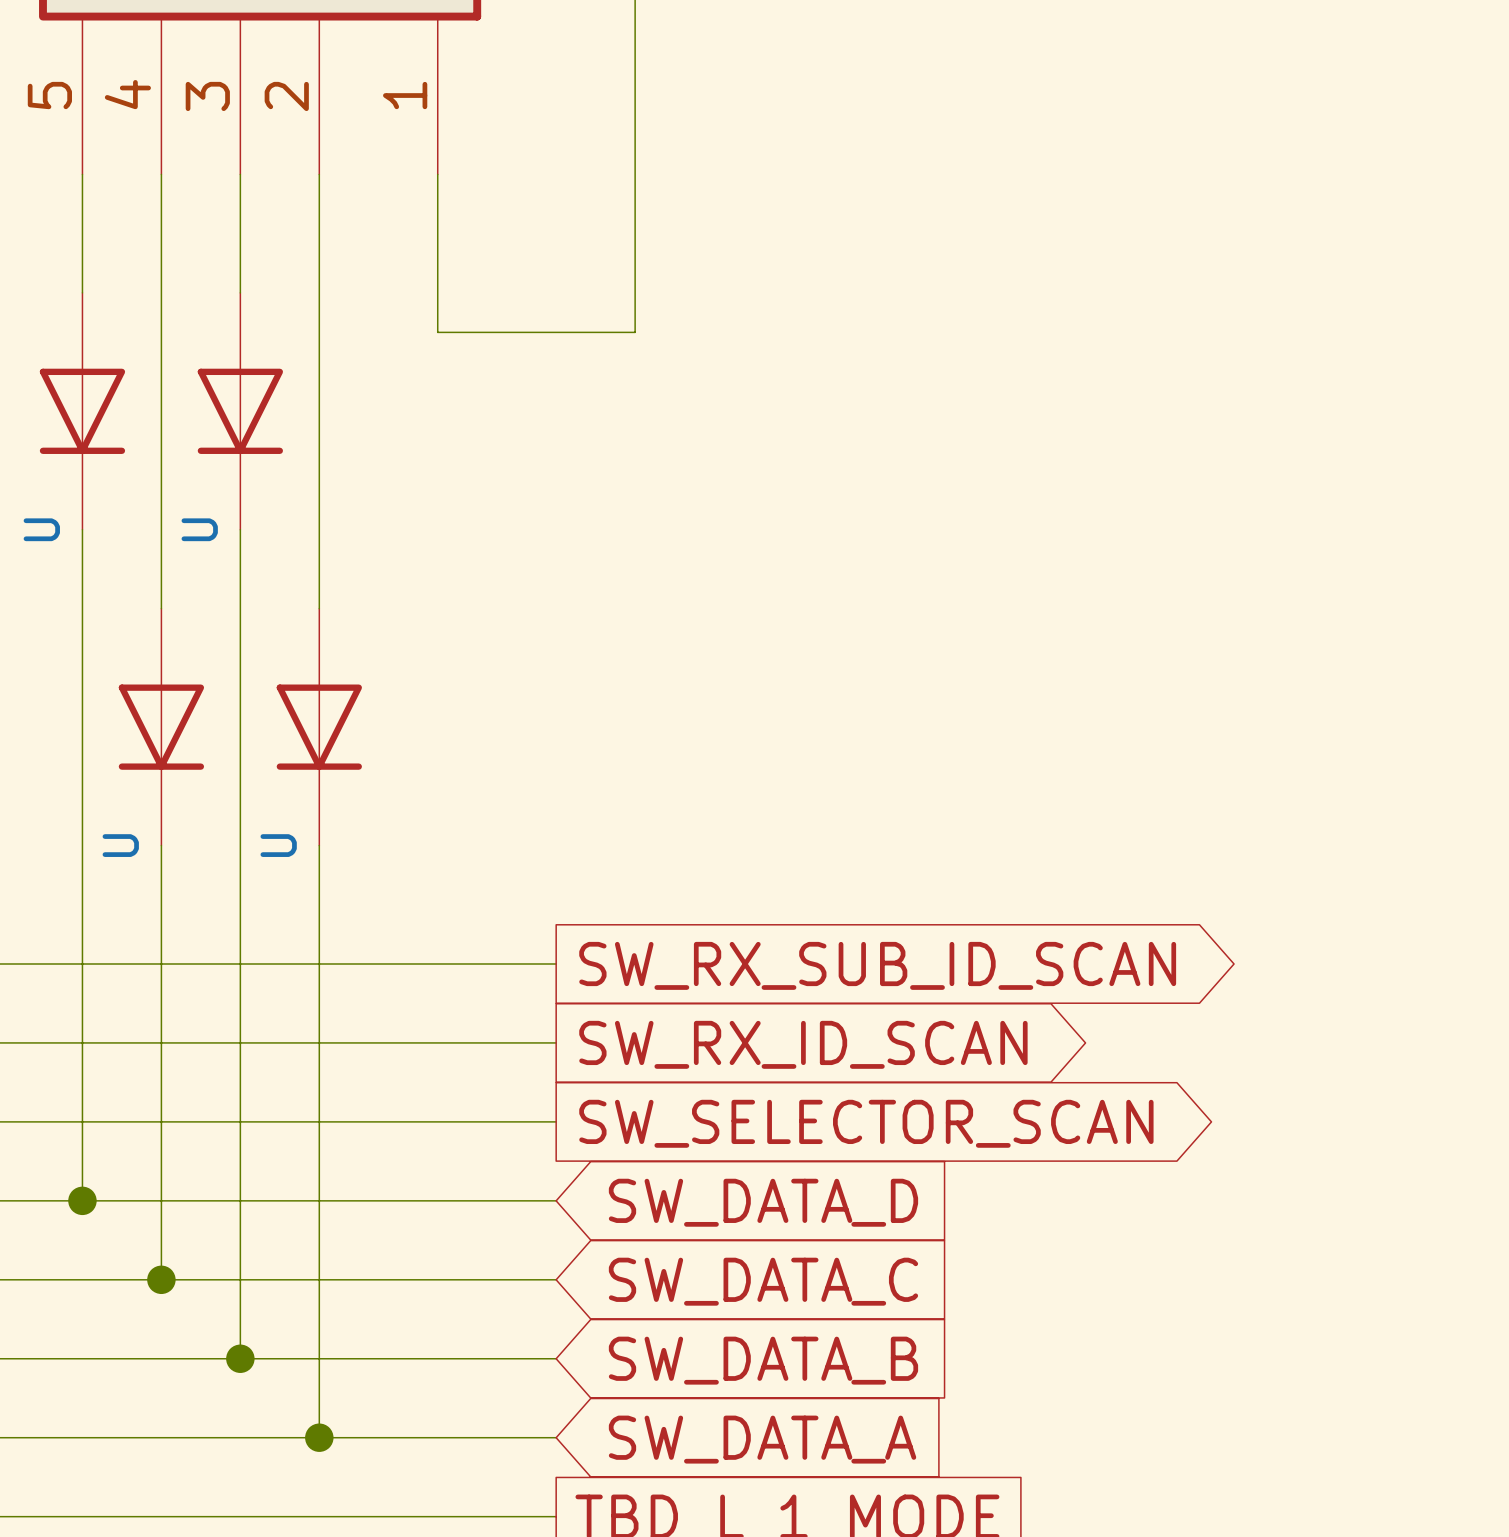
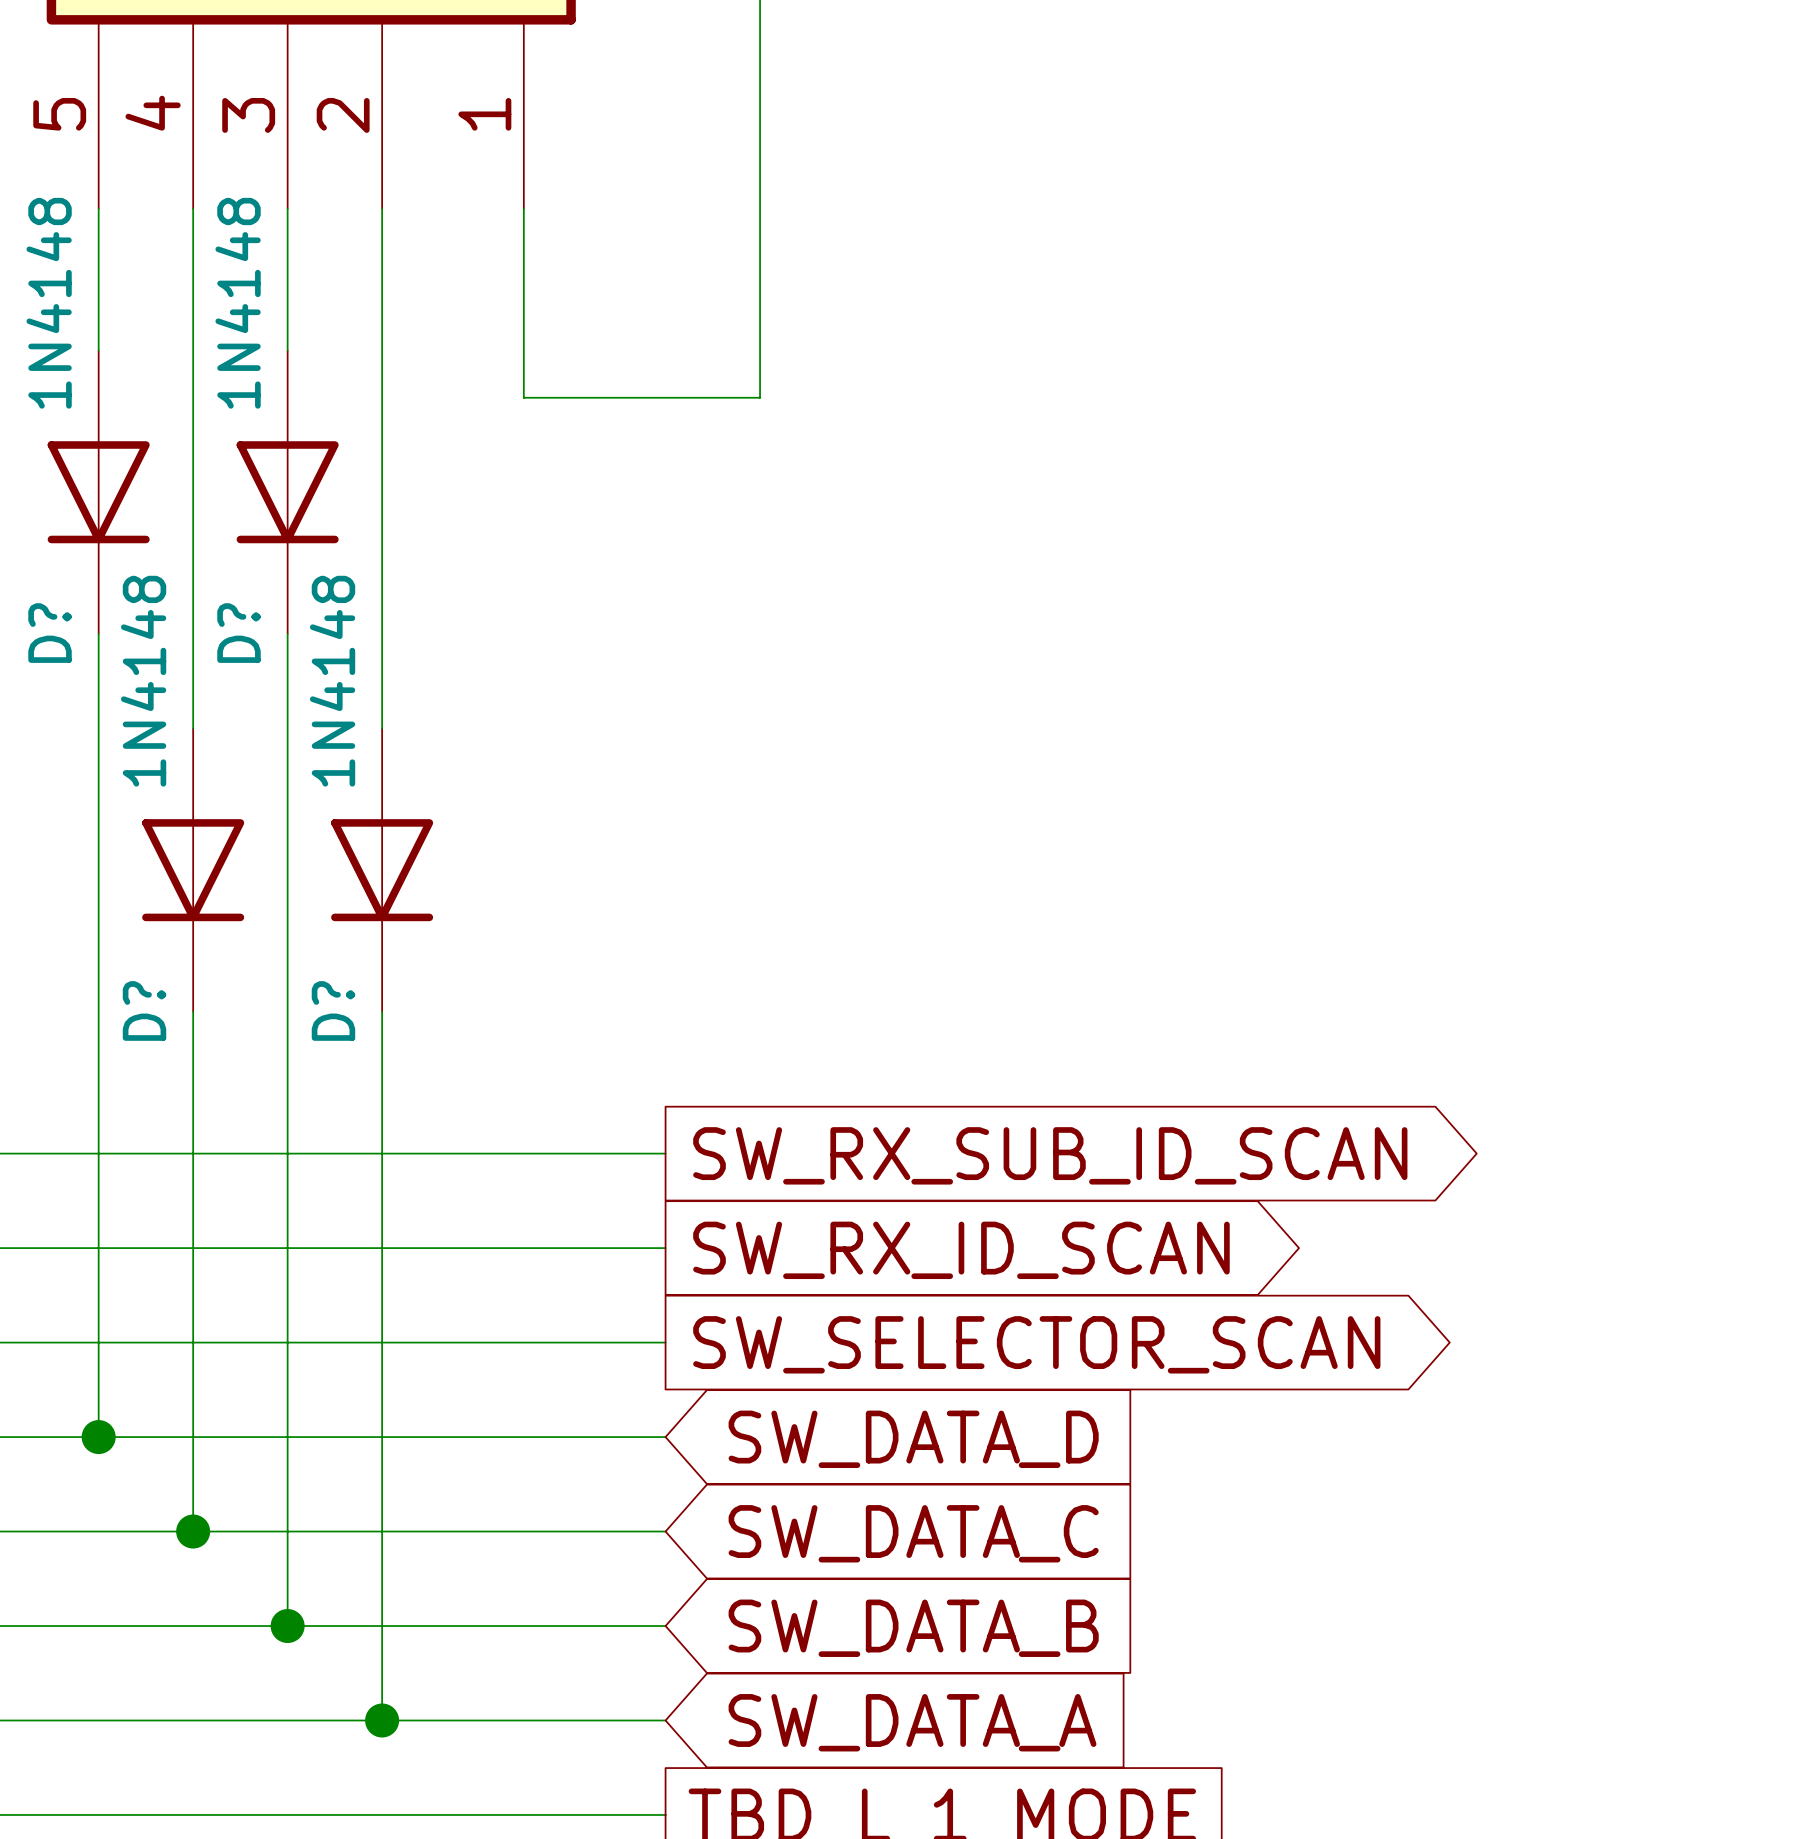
U value: none -> 1N4148 (49, 303)
U value: none -> 1N4148 (238, 303)
U name: U (41, 529) -> D? (50, 633)
U name: U (199, 529) -> D? (238, 633)
U value: none -> 1N4148 (143, 681)
U value: none -> 1N4148 (332, 681)
U name: U (120, 845) -> D? (144, 1010)
U name: U (278, 845) -> D? (333, 1010)

